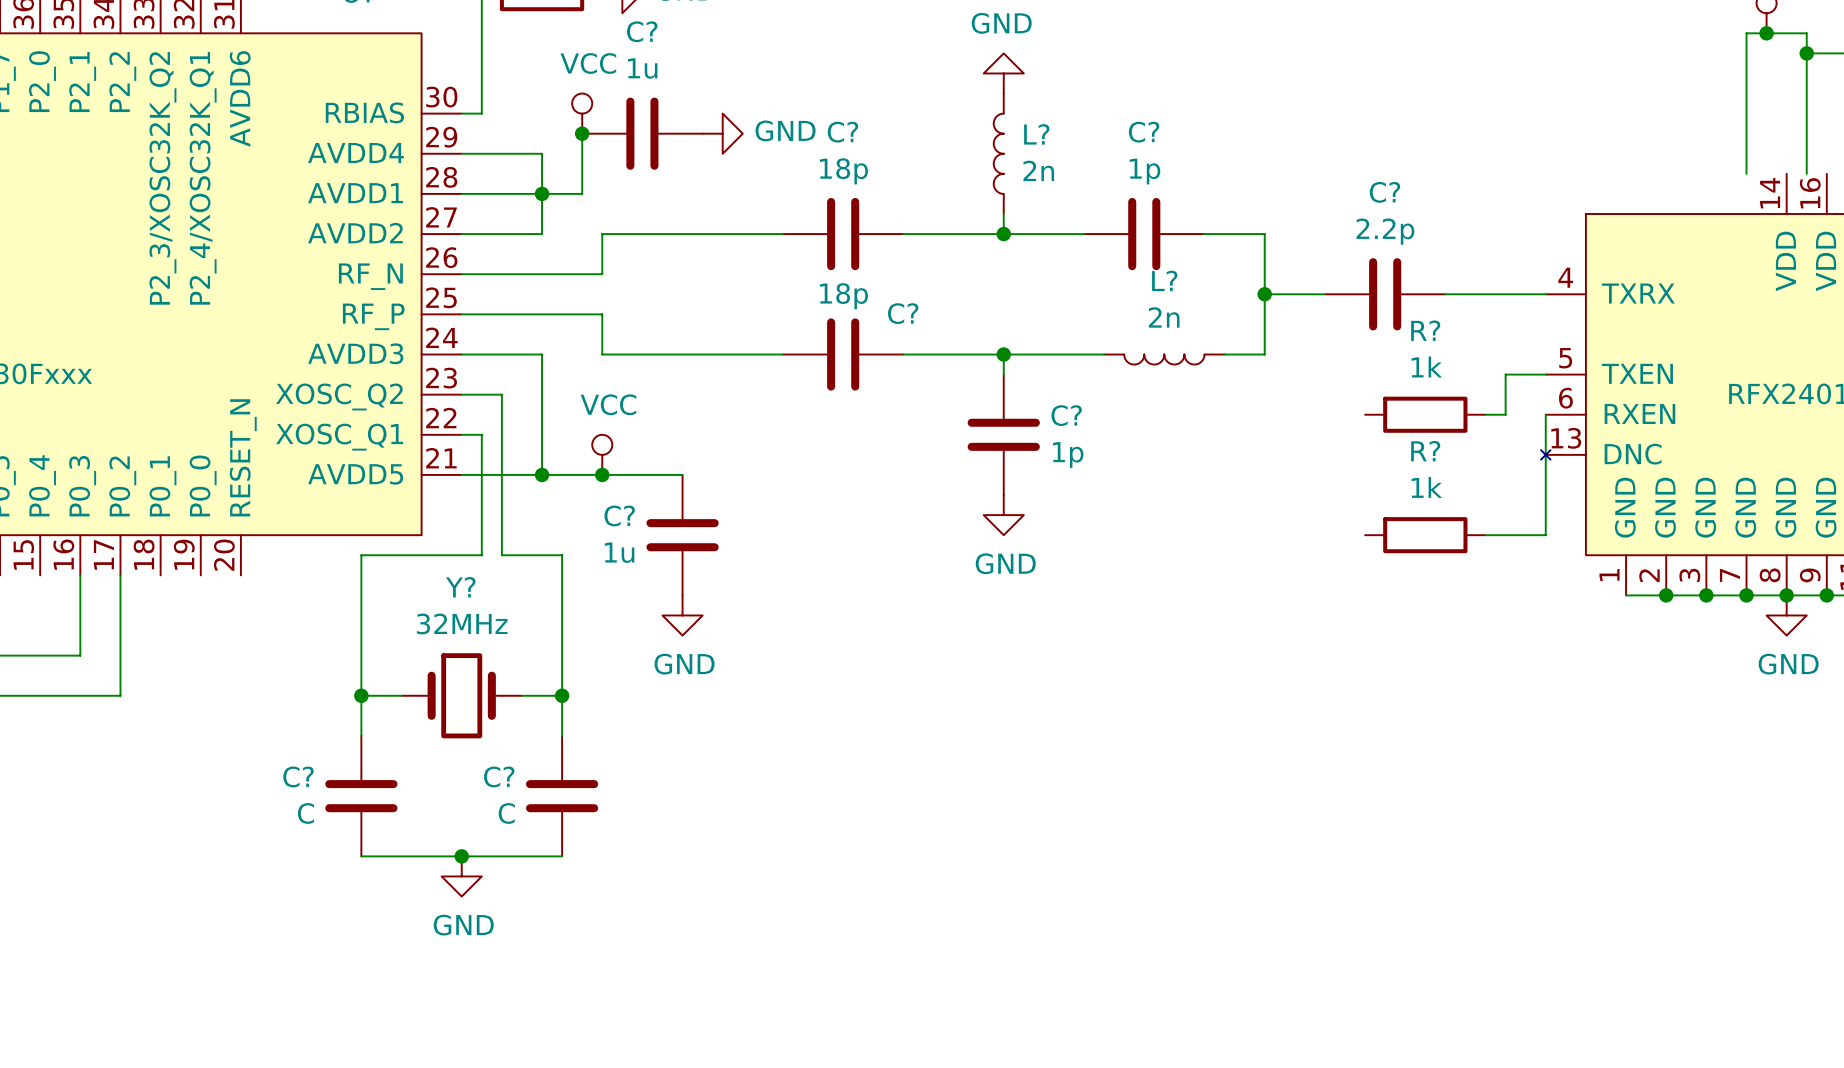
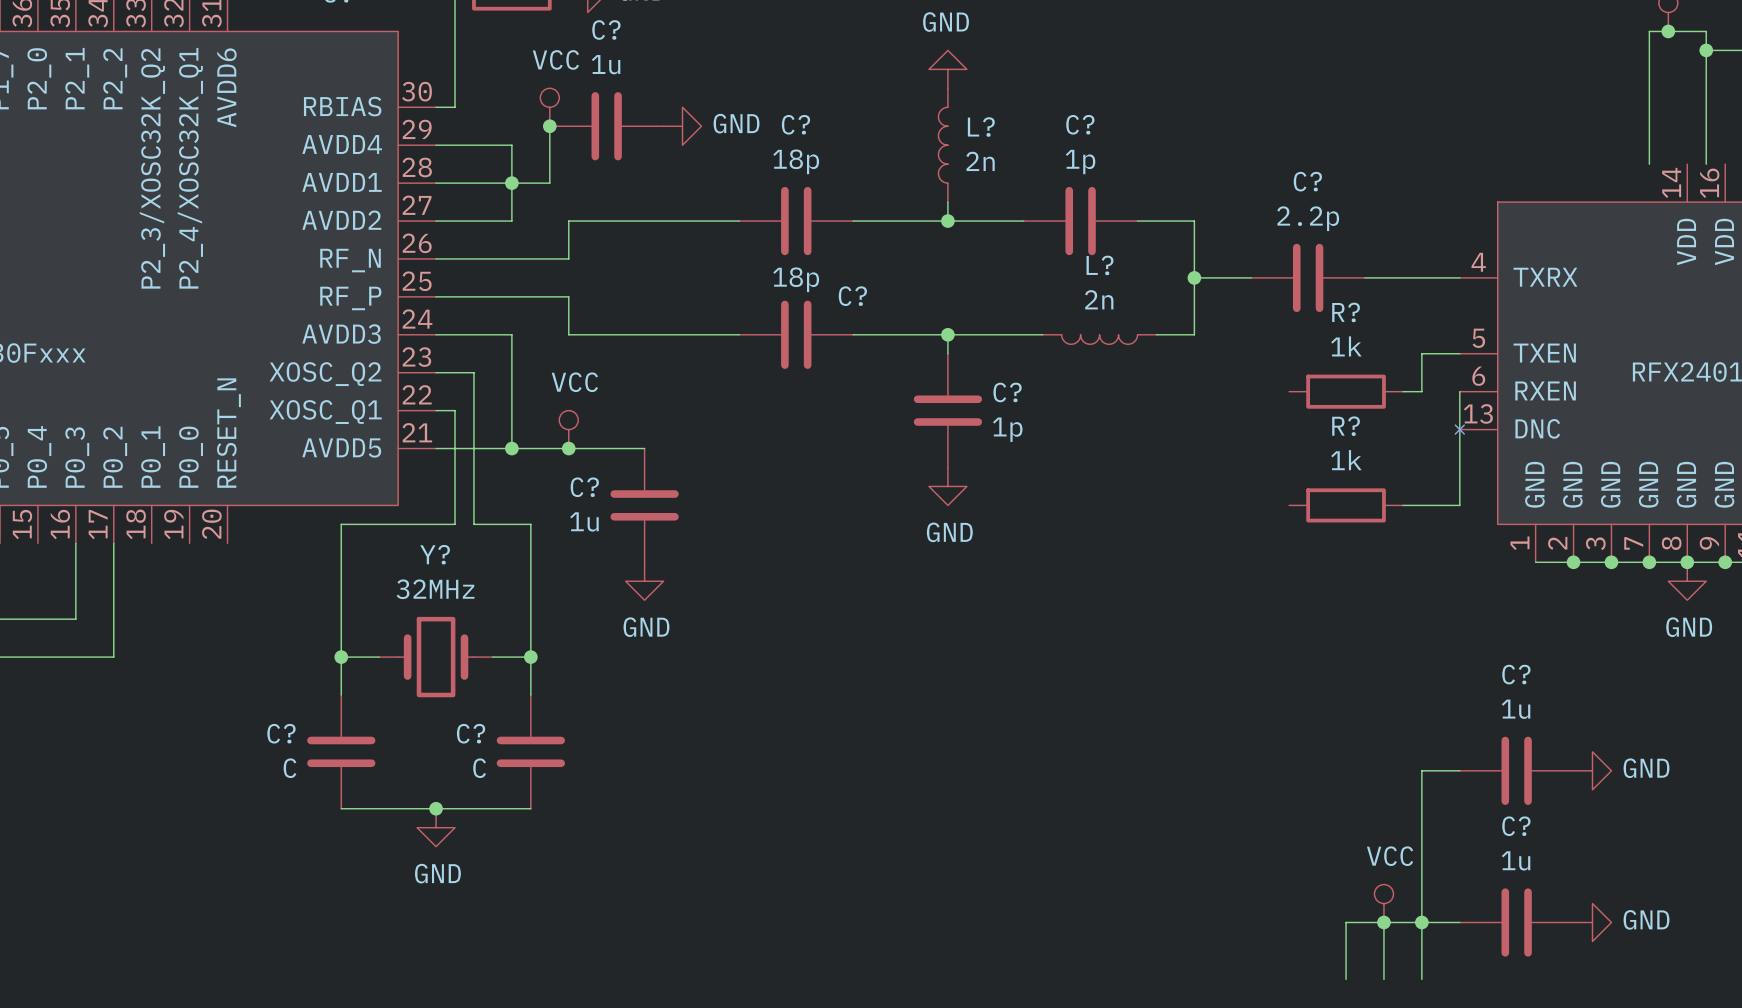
wire: none -> (1459, 770) (1421, 770) (1421, 979)
C?: none -> 1u (1516, 770)
power symbol: none -> GND (1592, 770)
power symbol: none -> VCC (1383, 903)
wire: none -> (1383, 922) (1383, 979)
junction: none -> (1383, 922)
junction: none -> (1421, 922)
wire: none -> (1459, 922) (1346, 922) (1346, 979)
C?: none -> 1u (1516, 922)
power symbol: none -> GND (1592, 922)

